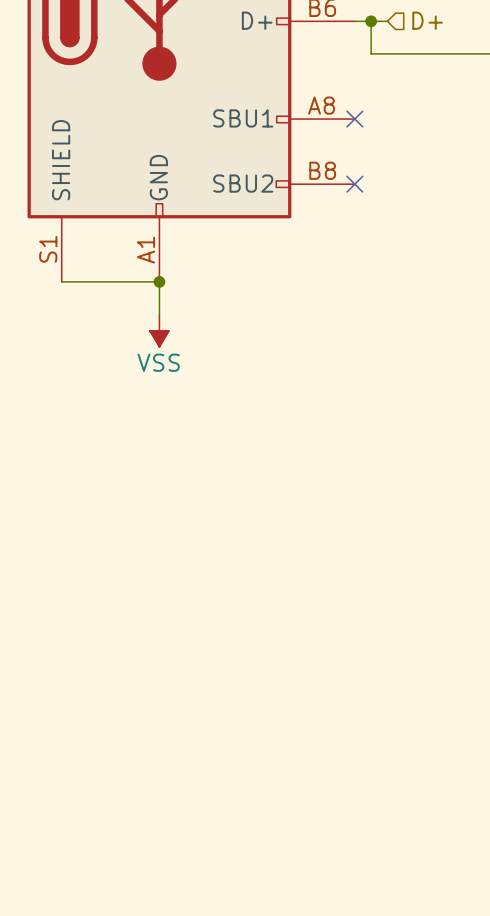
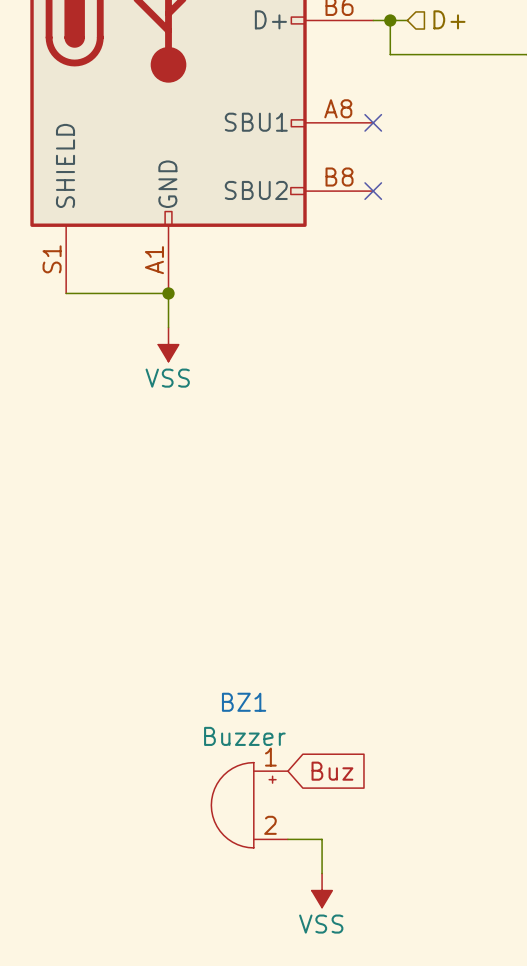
global label: none -> Buz (332, 771)
BZ1: none -> Buzzer (249, 805)
wire: none -> (287, 839) (322, 839) (322, 873)
power symbol: none -> VSS (322, 890)

